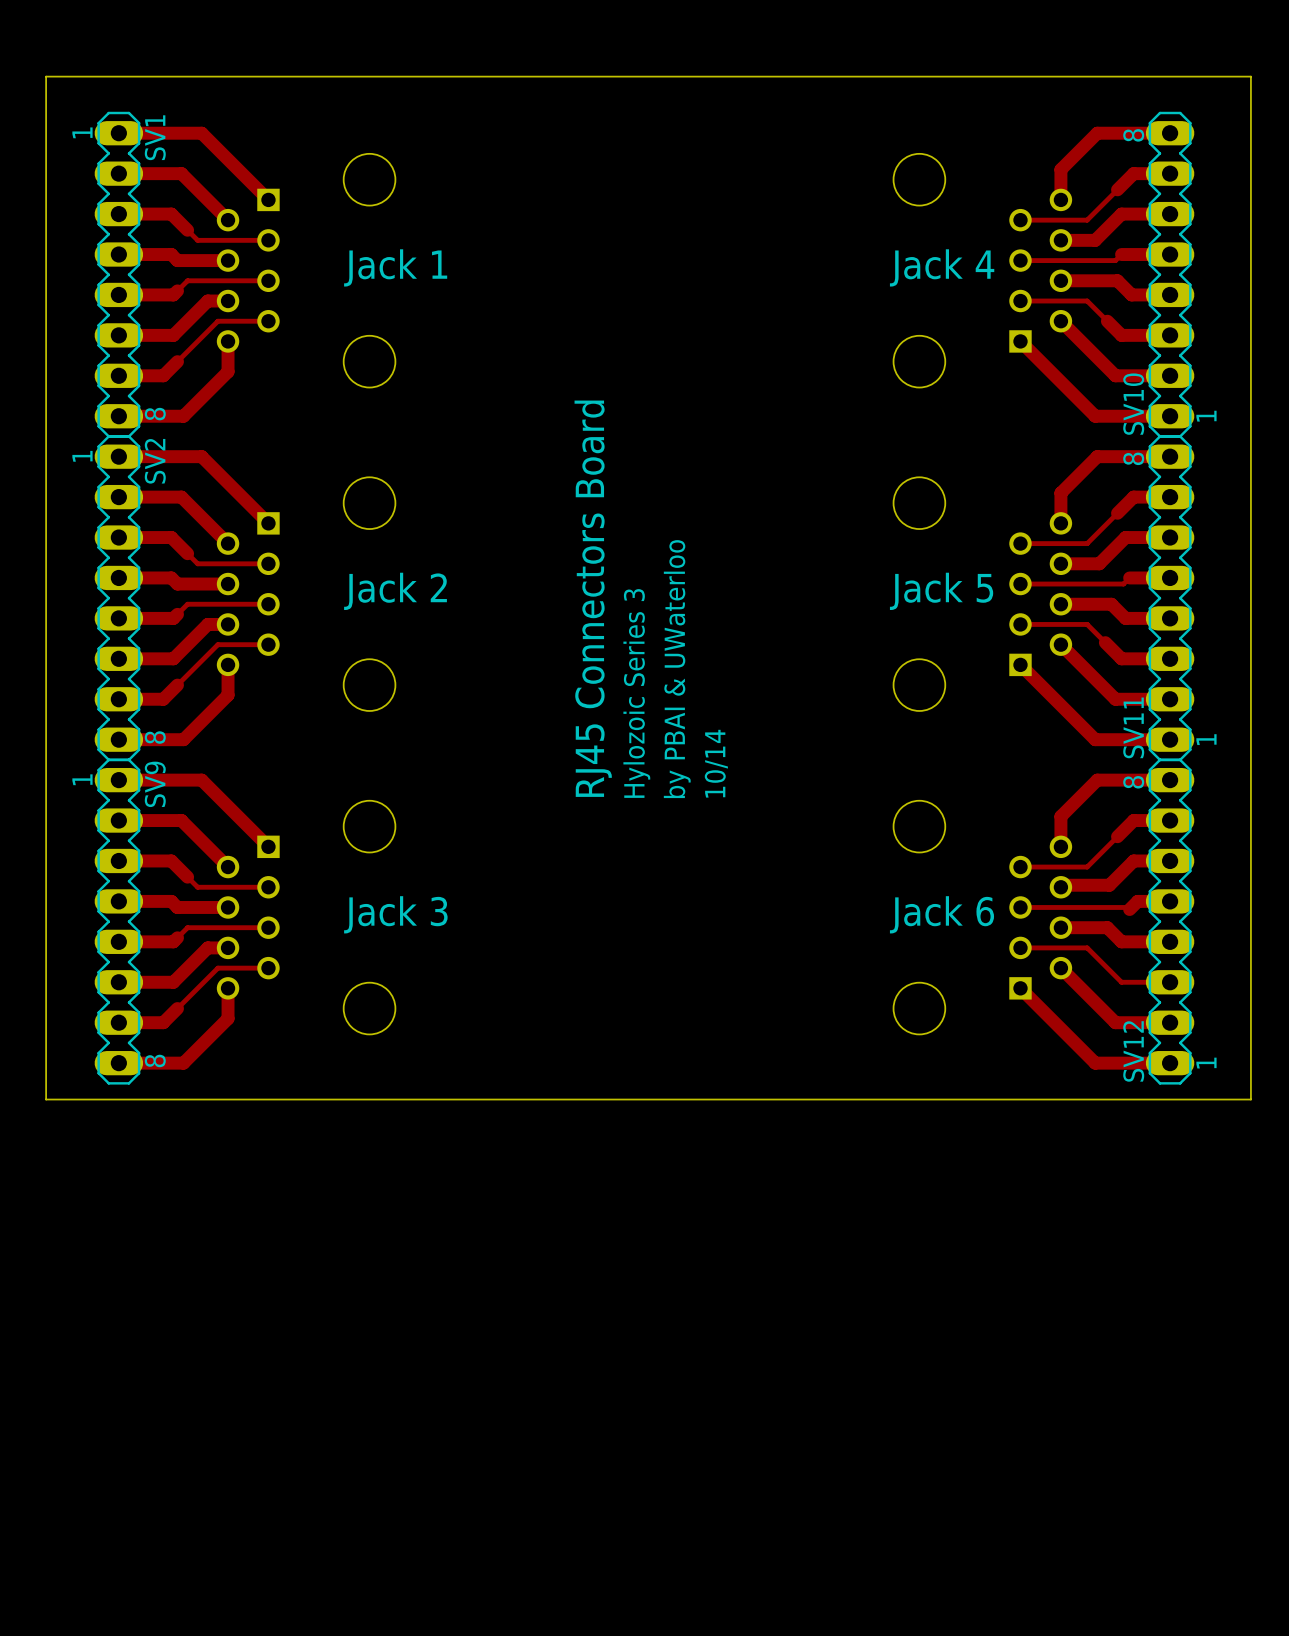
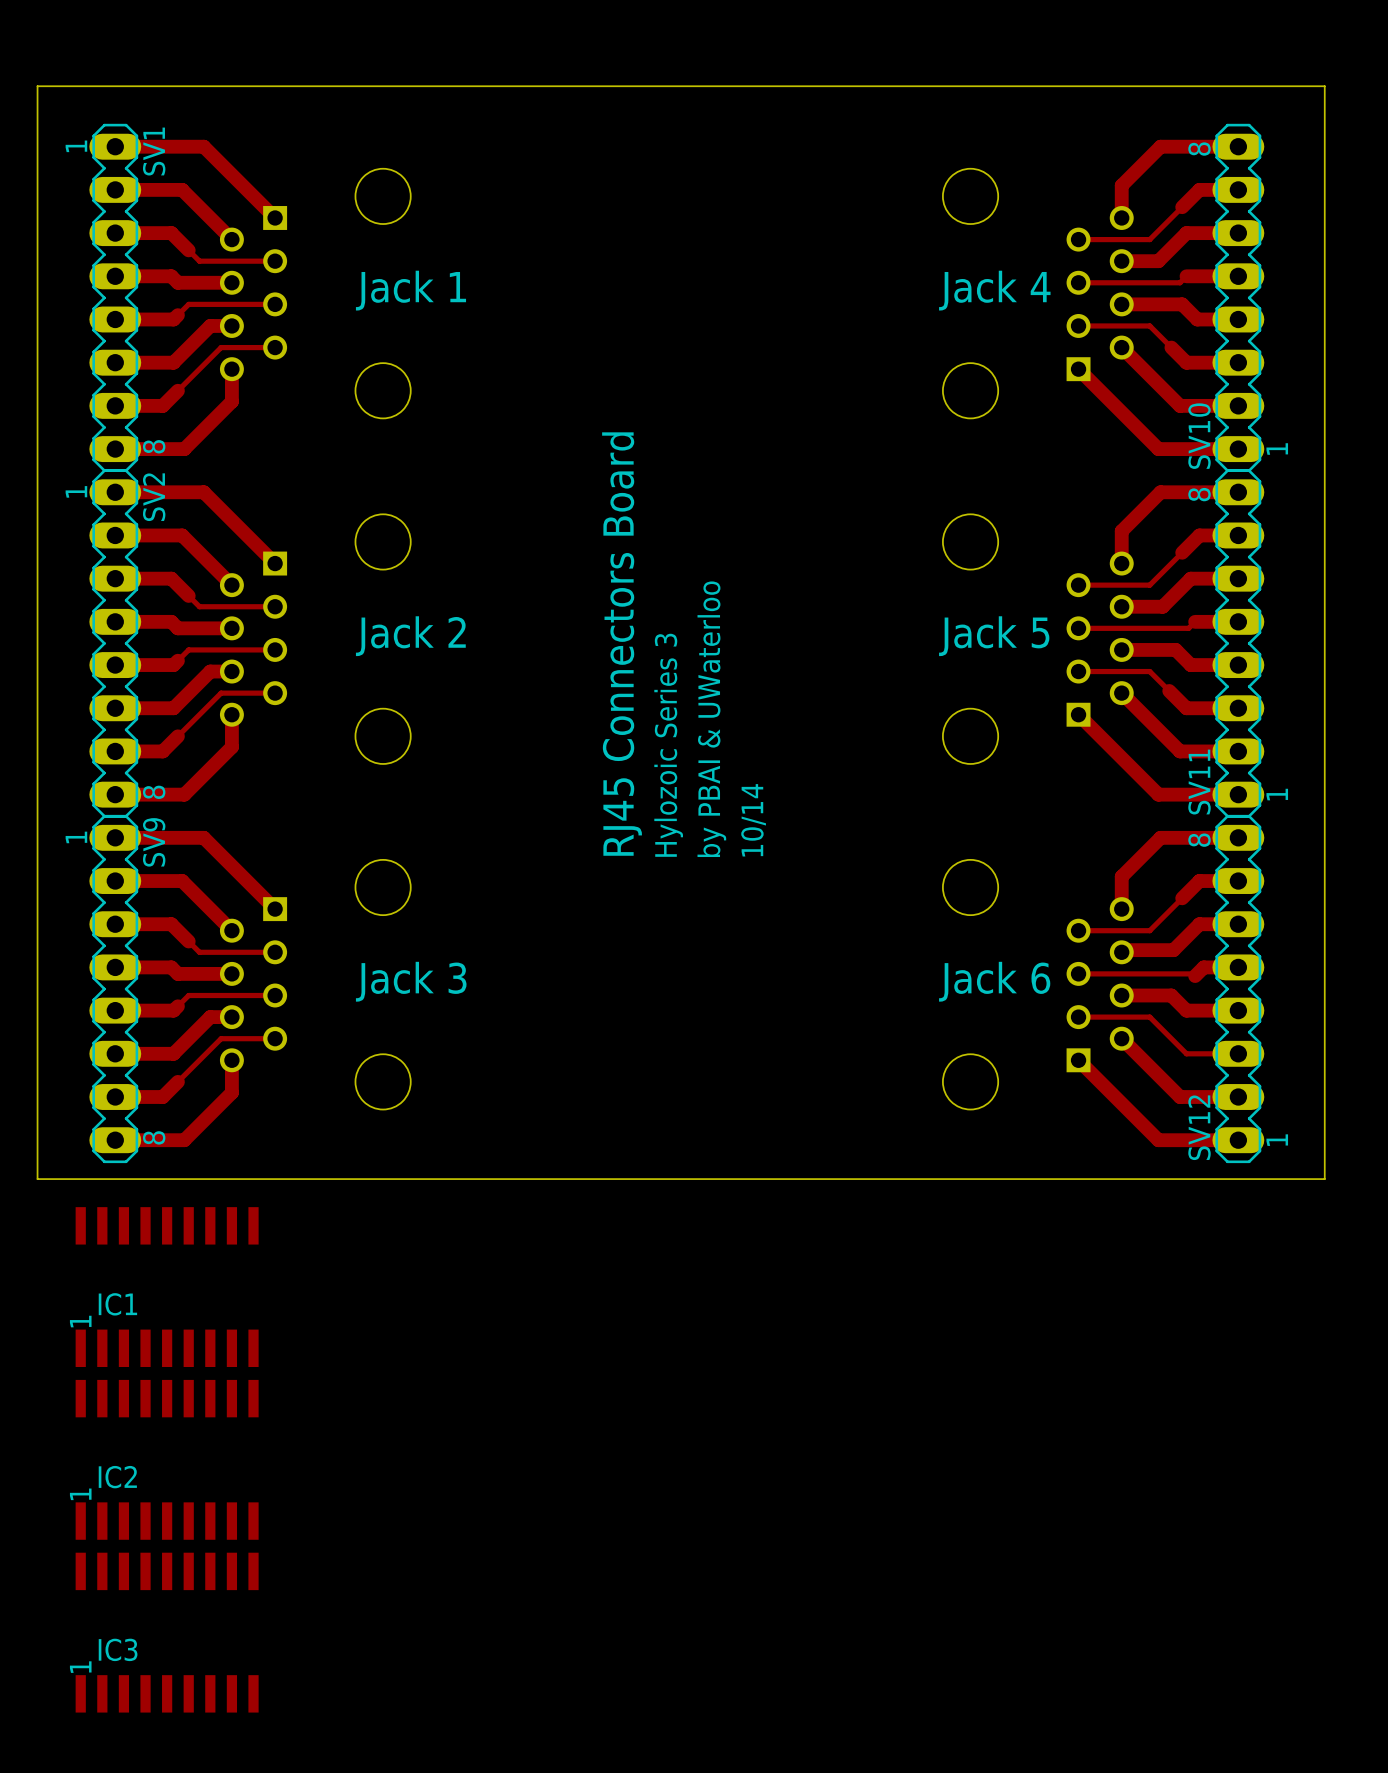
IC1: none -> (167, 1287)
IC2: none -> (167, 1459)
IC3: none -> (167, 1632)

